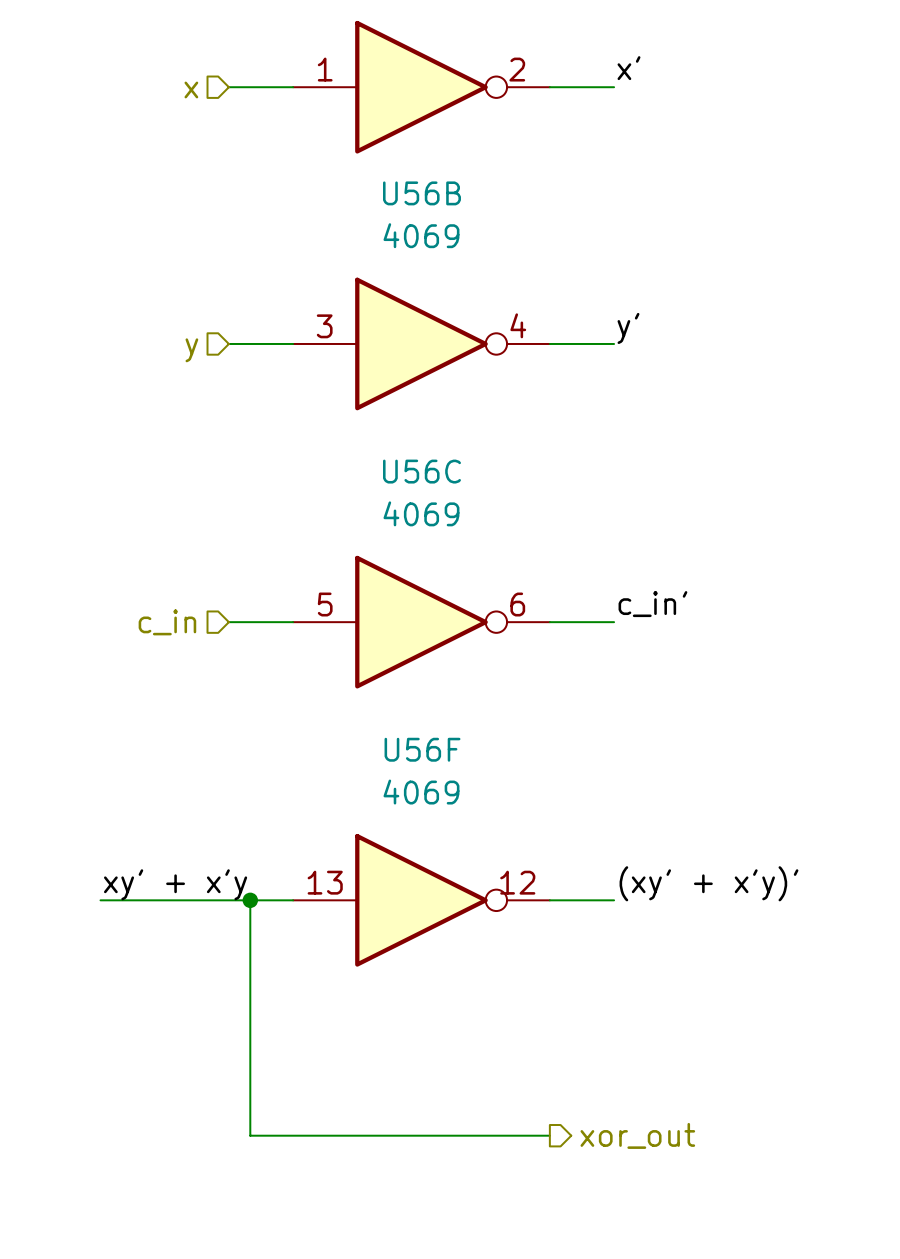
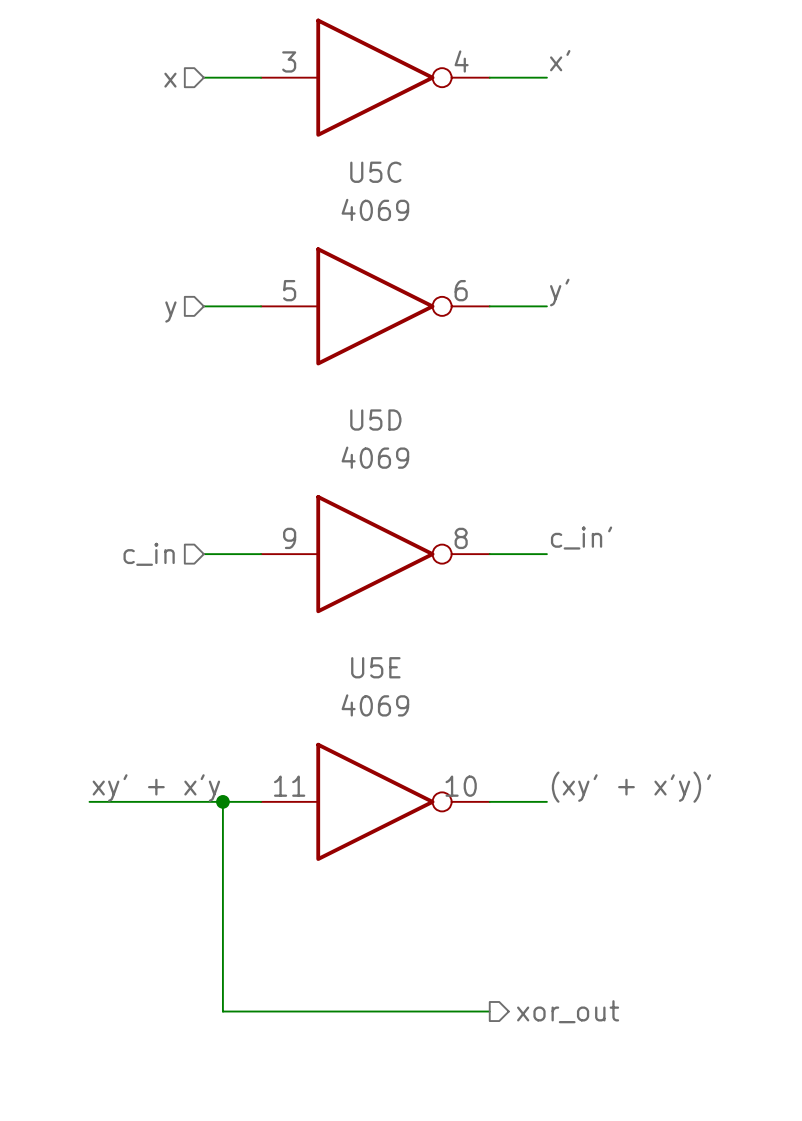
part pin number: 1 (325, 69) -> 3 (289, 61)
part pin number: 2 (517, 69) -> 4 (461, 61)
U56B name: U56B (421, 193) -> U5C (375, 172)
U56B pin number: 4 (518, 325) -> 6 (461, 290)
U56B pin number: 3 (324, 326) -> 5 (289, 290)
U56C name: U56C (421, 471) -> U5D (375, 420)
U56C pin number: 5 (325, 604) -> 9 (289, 538)
U56C pin number: 6 (517, 604) -> 8 (461, 538)
U56F name: U56F (422, 749) -> U5E (375, 667)
U56F pin number: 13 (325, 882) -> 11 (289, 786)
U56F pin number: 12 (517, 882) -> 10 (461, 786)

